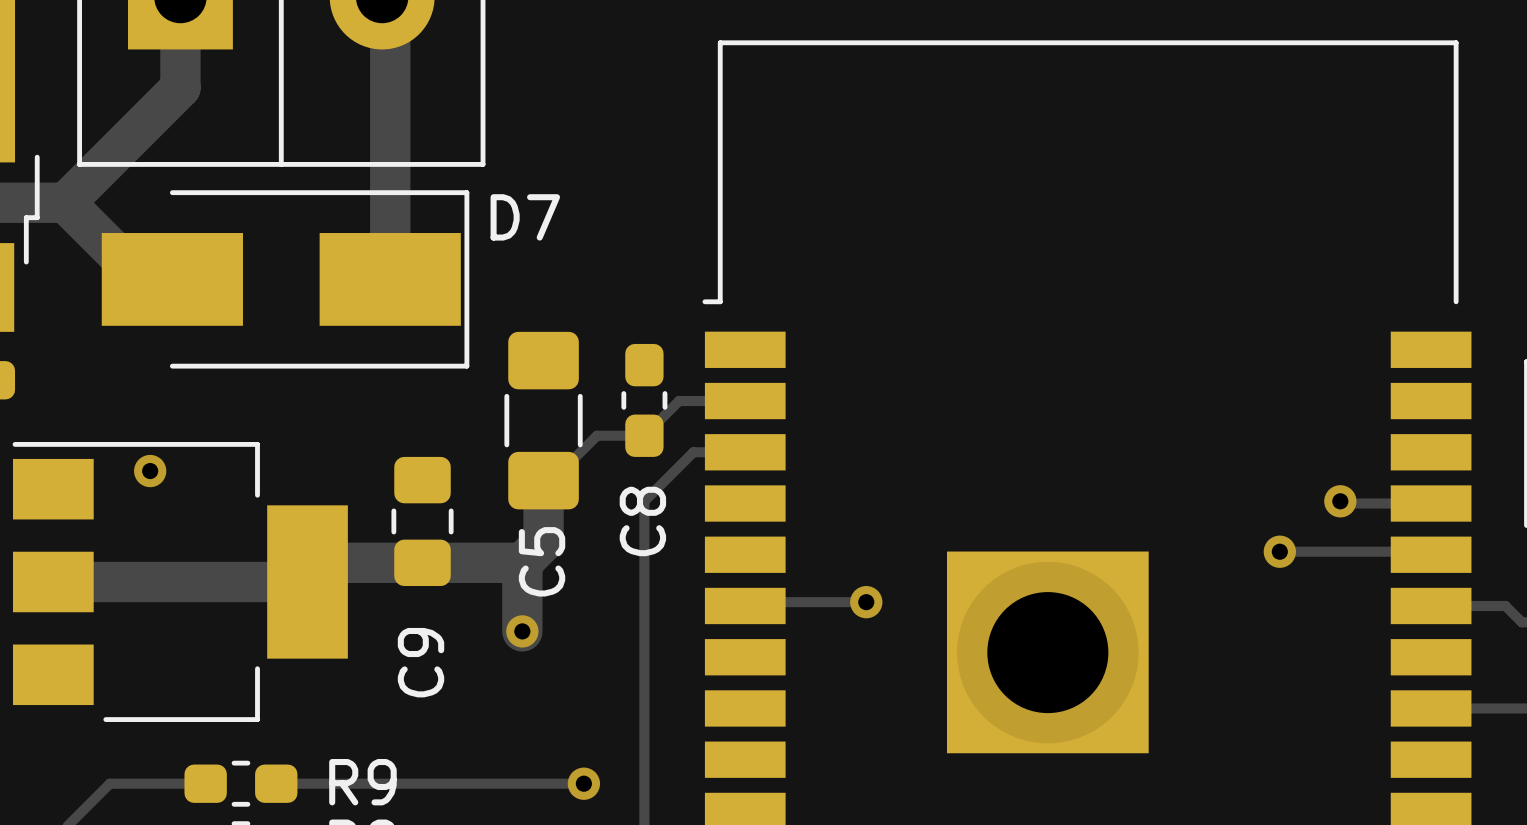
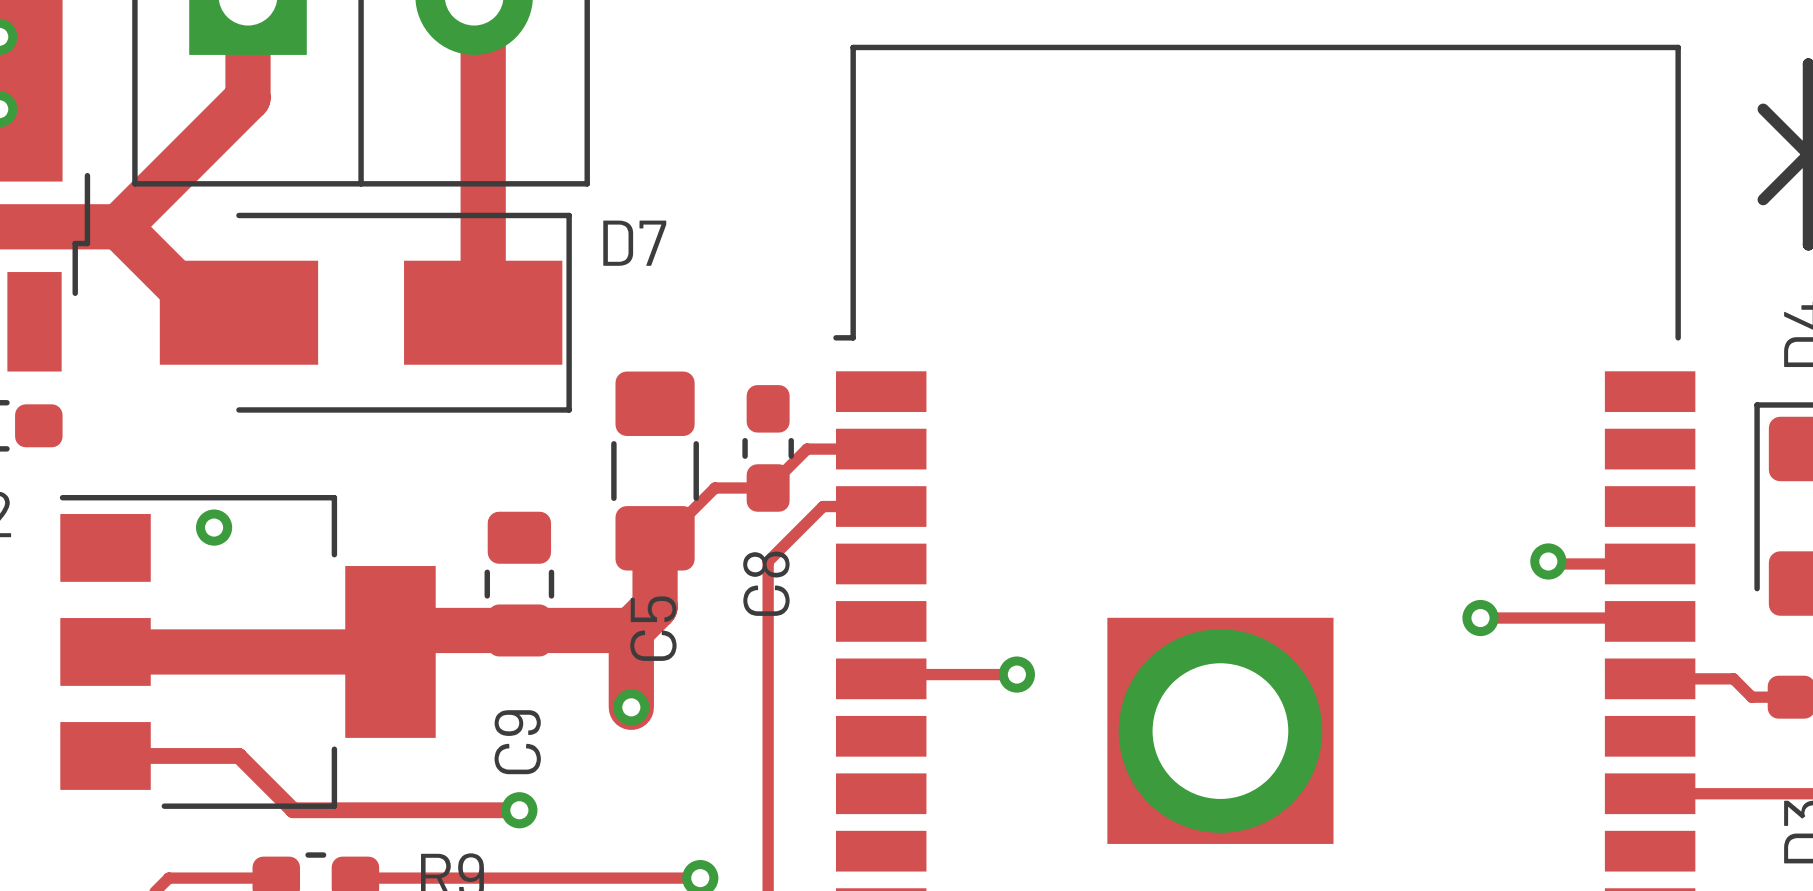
track: none -> (105, 755) (238, 755) (293, 810) (519, 810)
via: none -> (519, 810)

